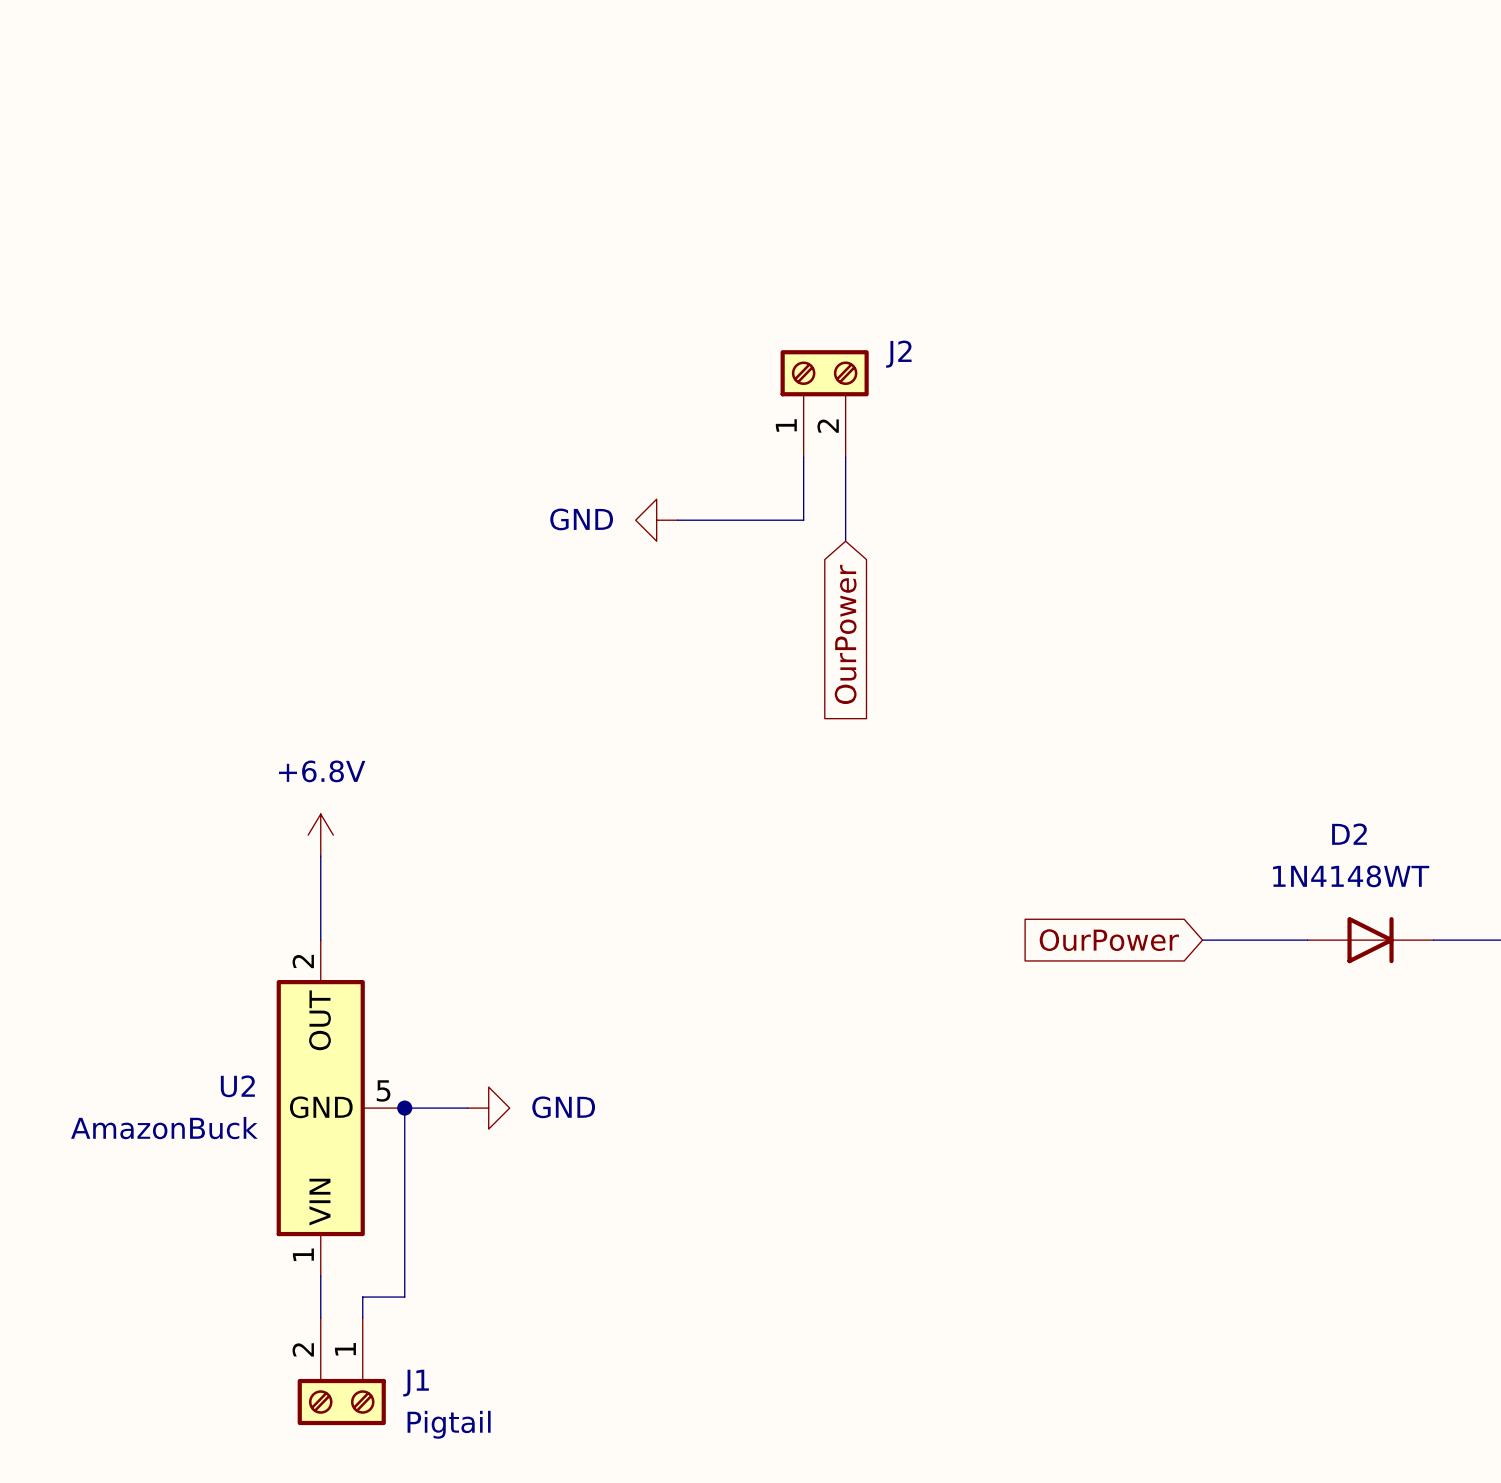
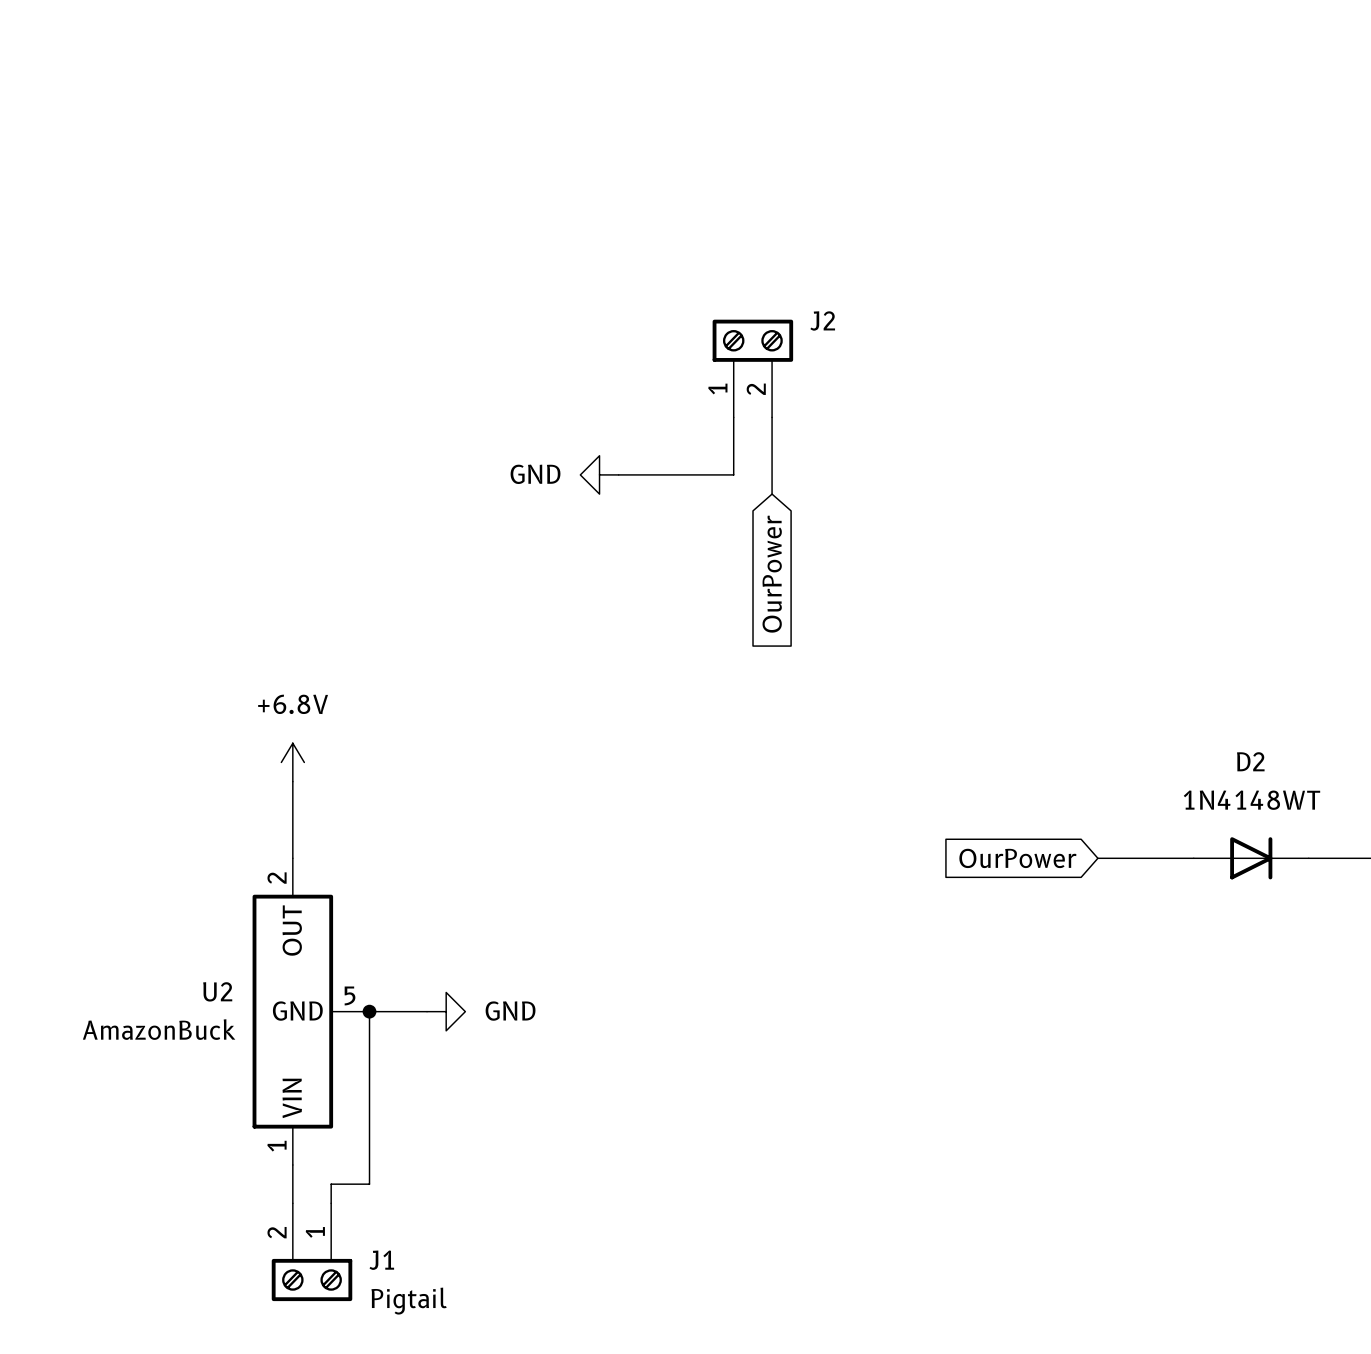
D2 name position: D2 (1349, 834) -> D2 (1250, 761)
D2 value position: 1N4148WT (1351, 876) -> 1N4148WT (1251, 800)

